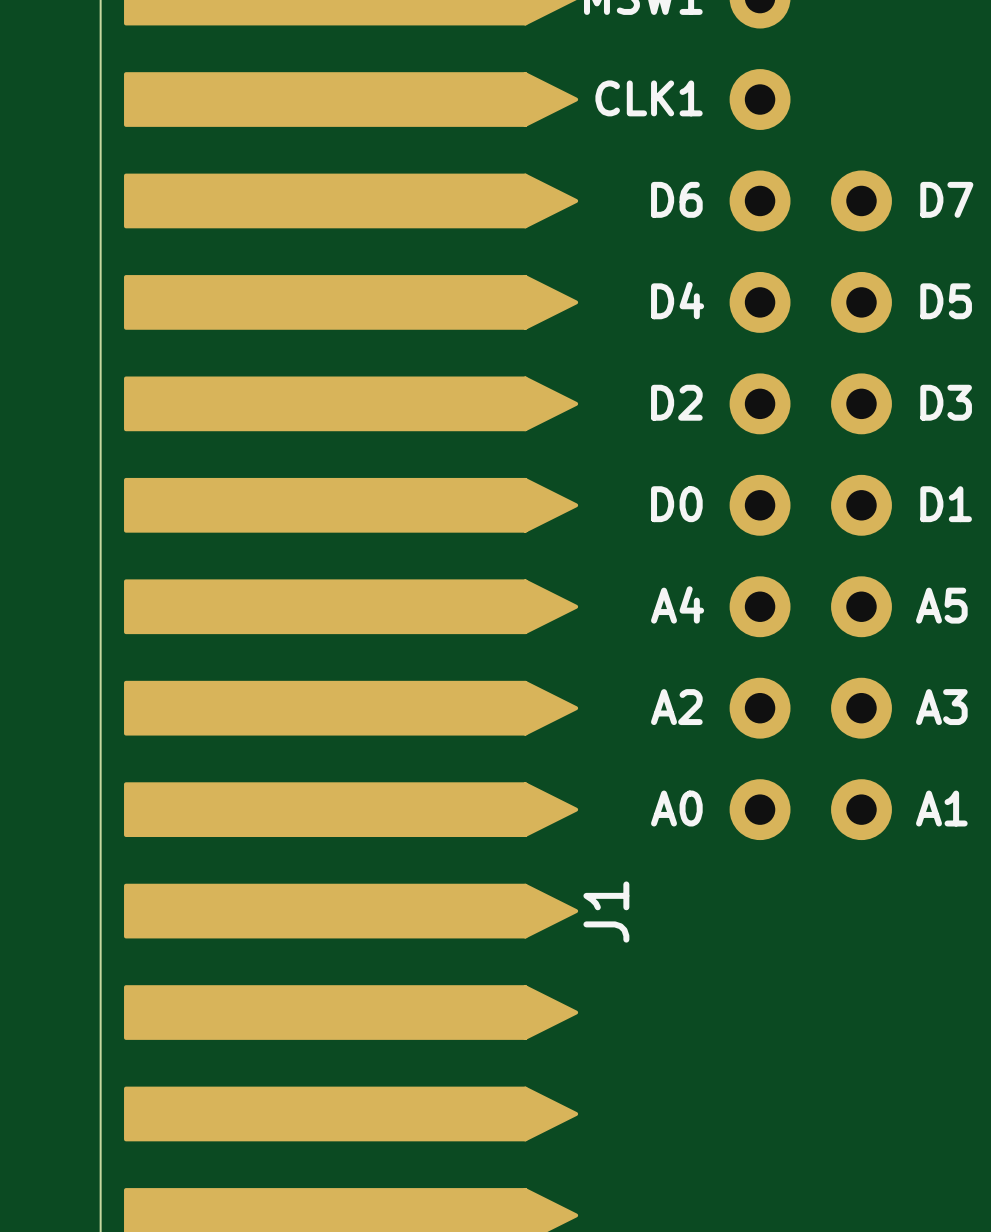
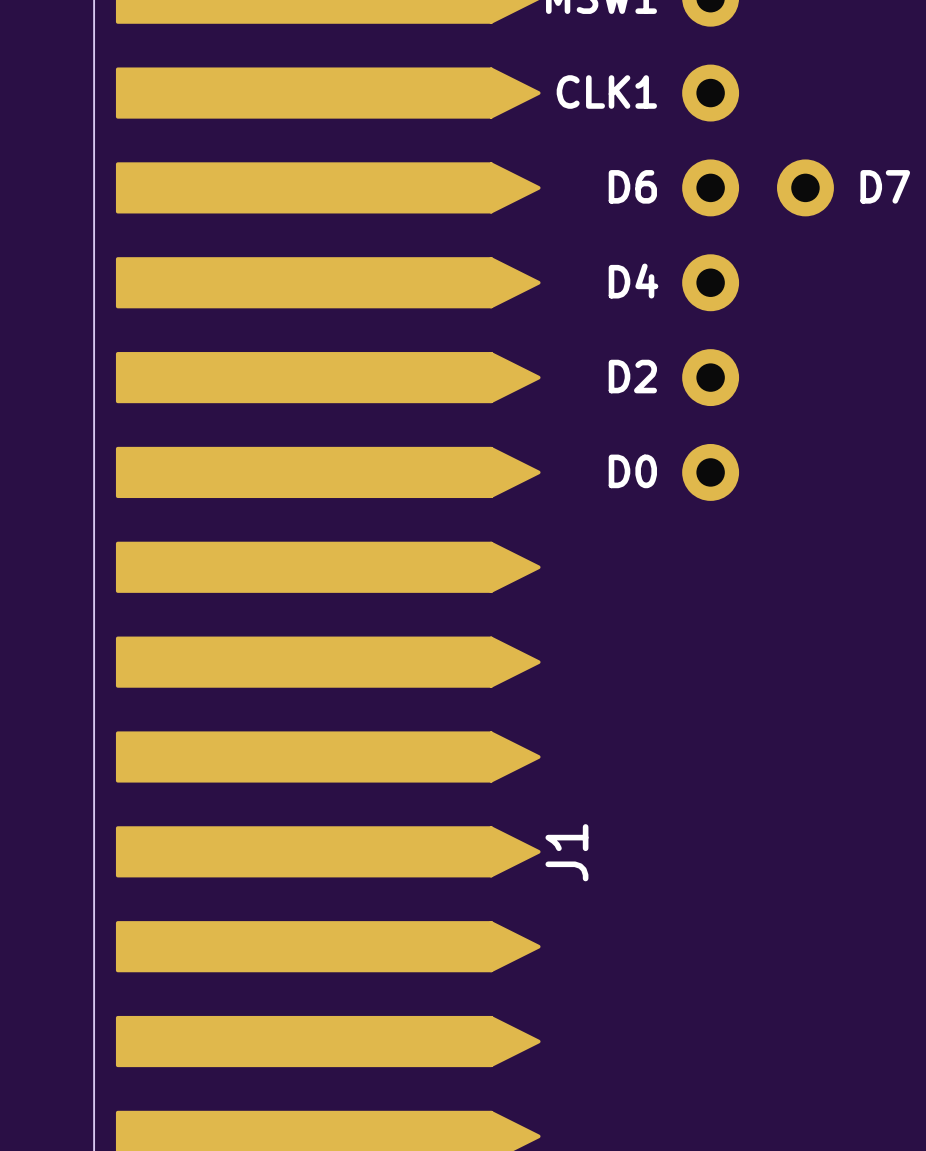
D5: (861, 302) -> none
D3: (861, 403) -> none
D1: (861, 505) -> none
A4: (760, 606) -> none
A5: (861, 606) -> none
A2: (760, 708) -> none
A3: (861, 708) -> none
A0: (760, 809) -> none
A1: (861, 809) -> none

